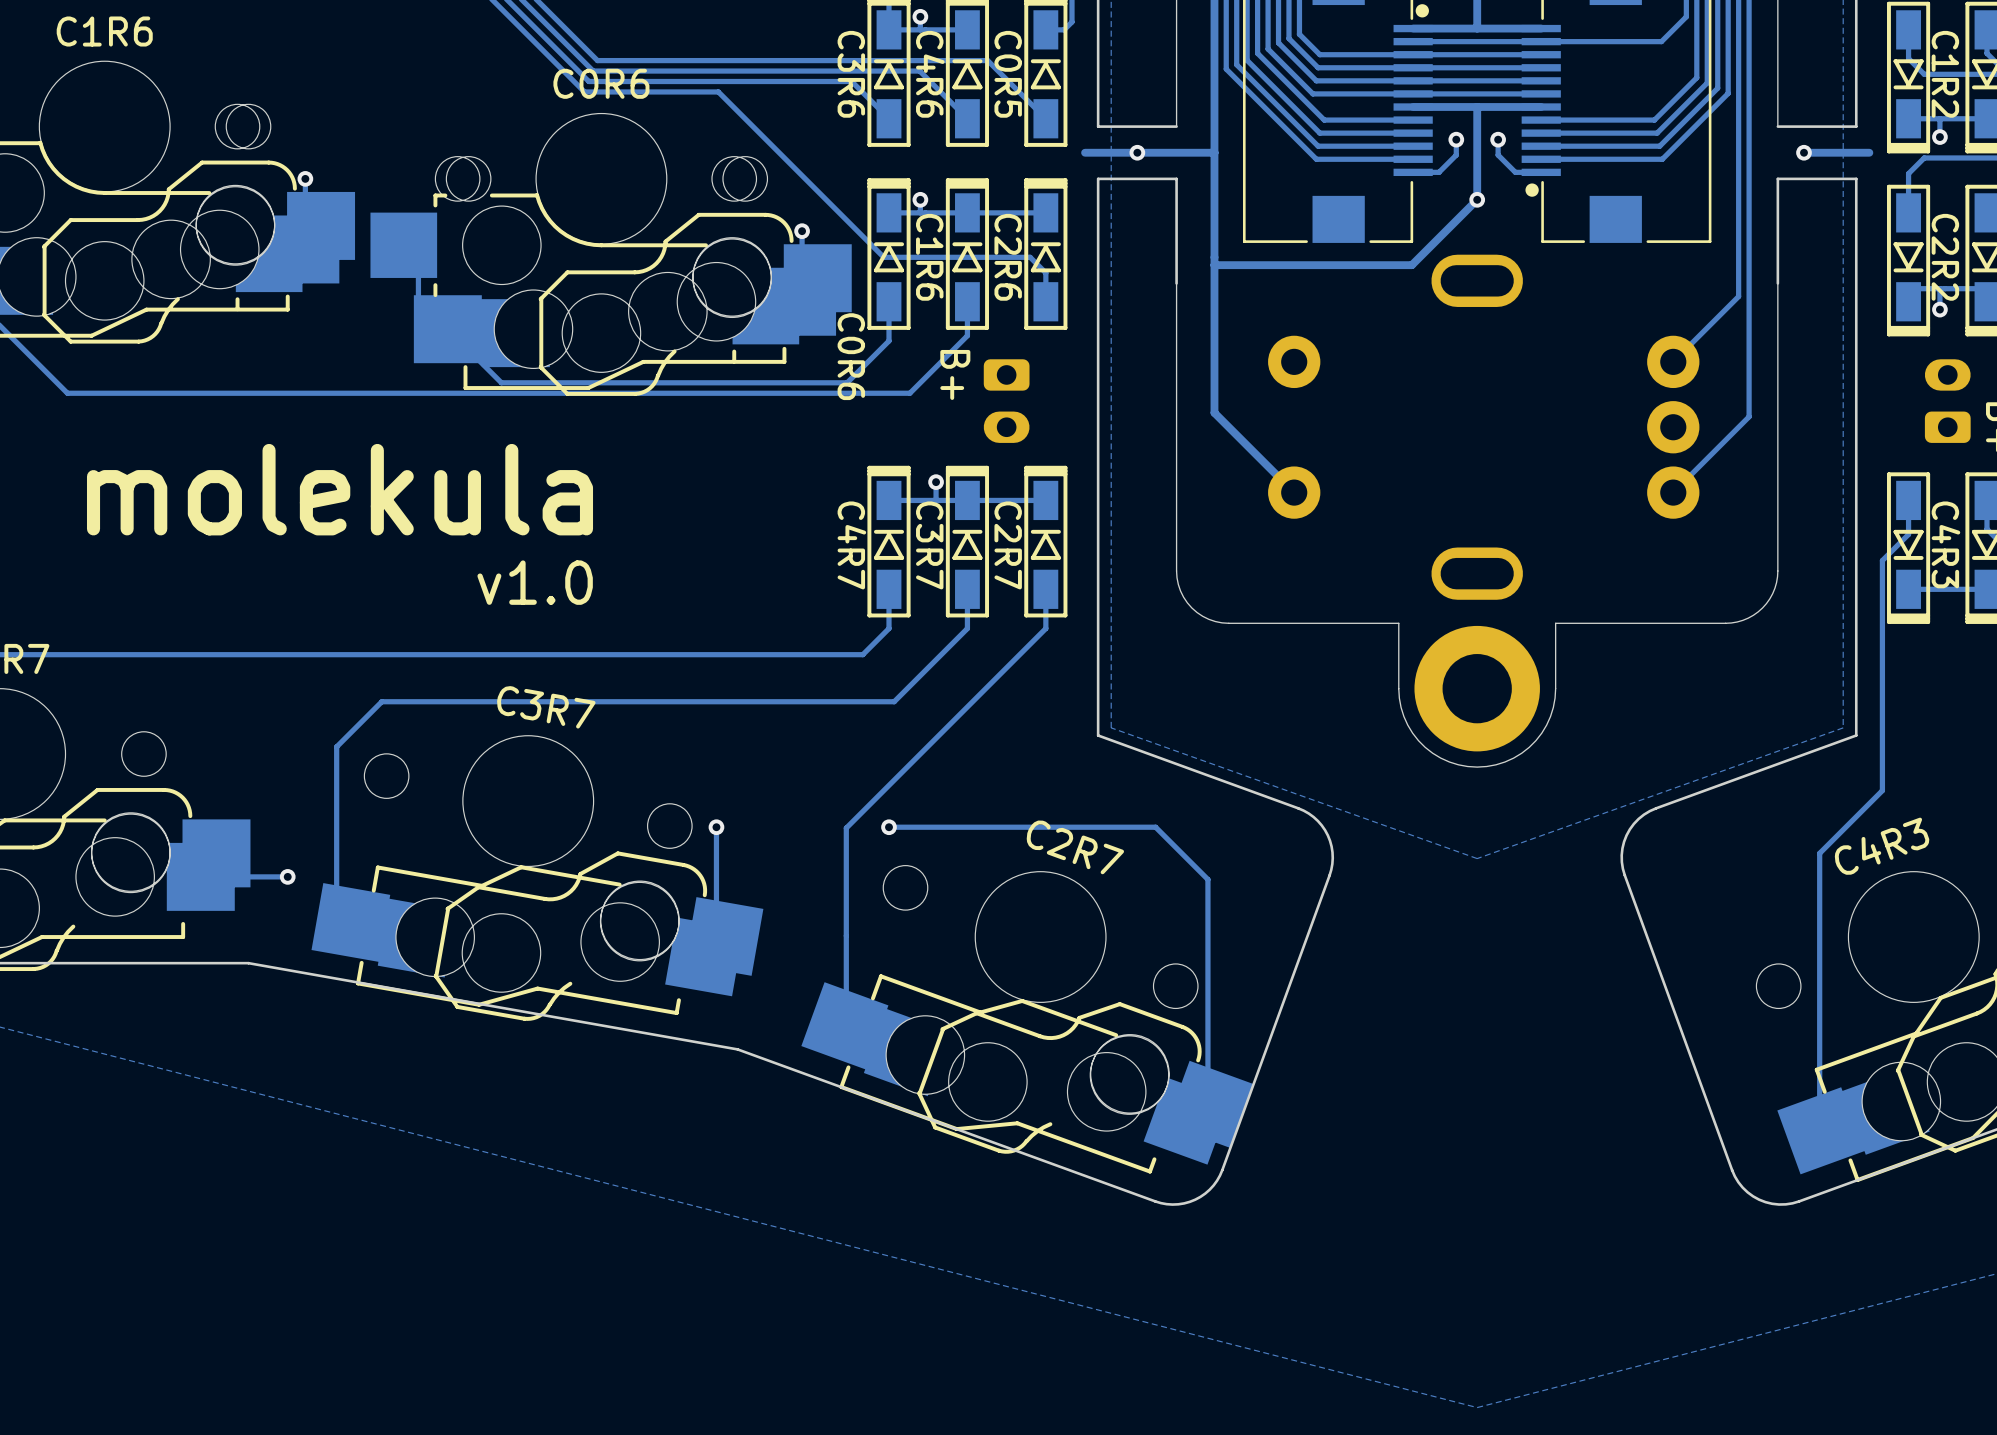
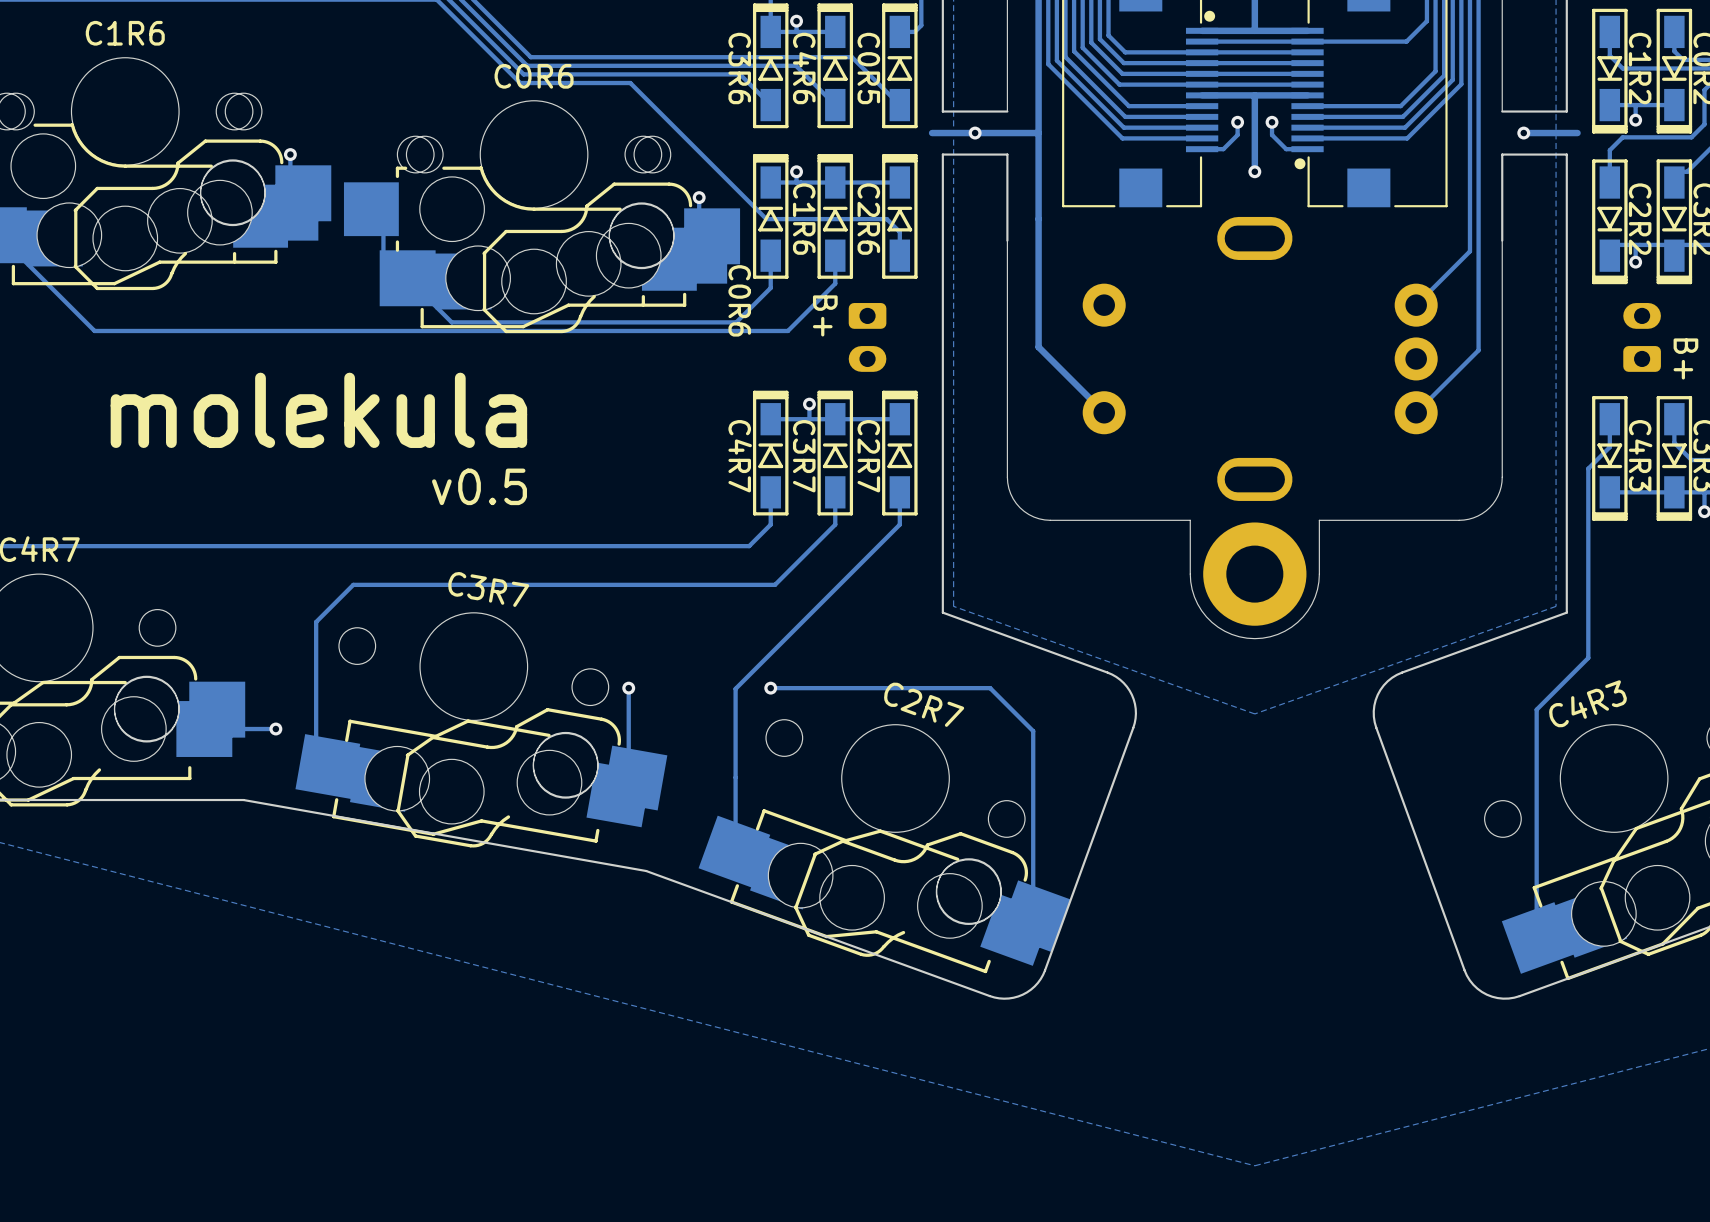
track: (1477, 199) (1411, 265) (1214, 265) -> none
text: v1.0 (535, 582) -> v0.5 (479, 486)

